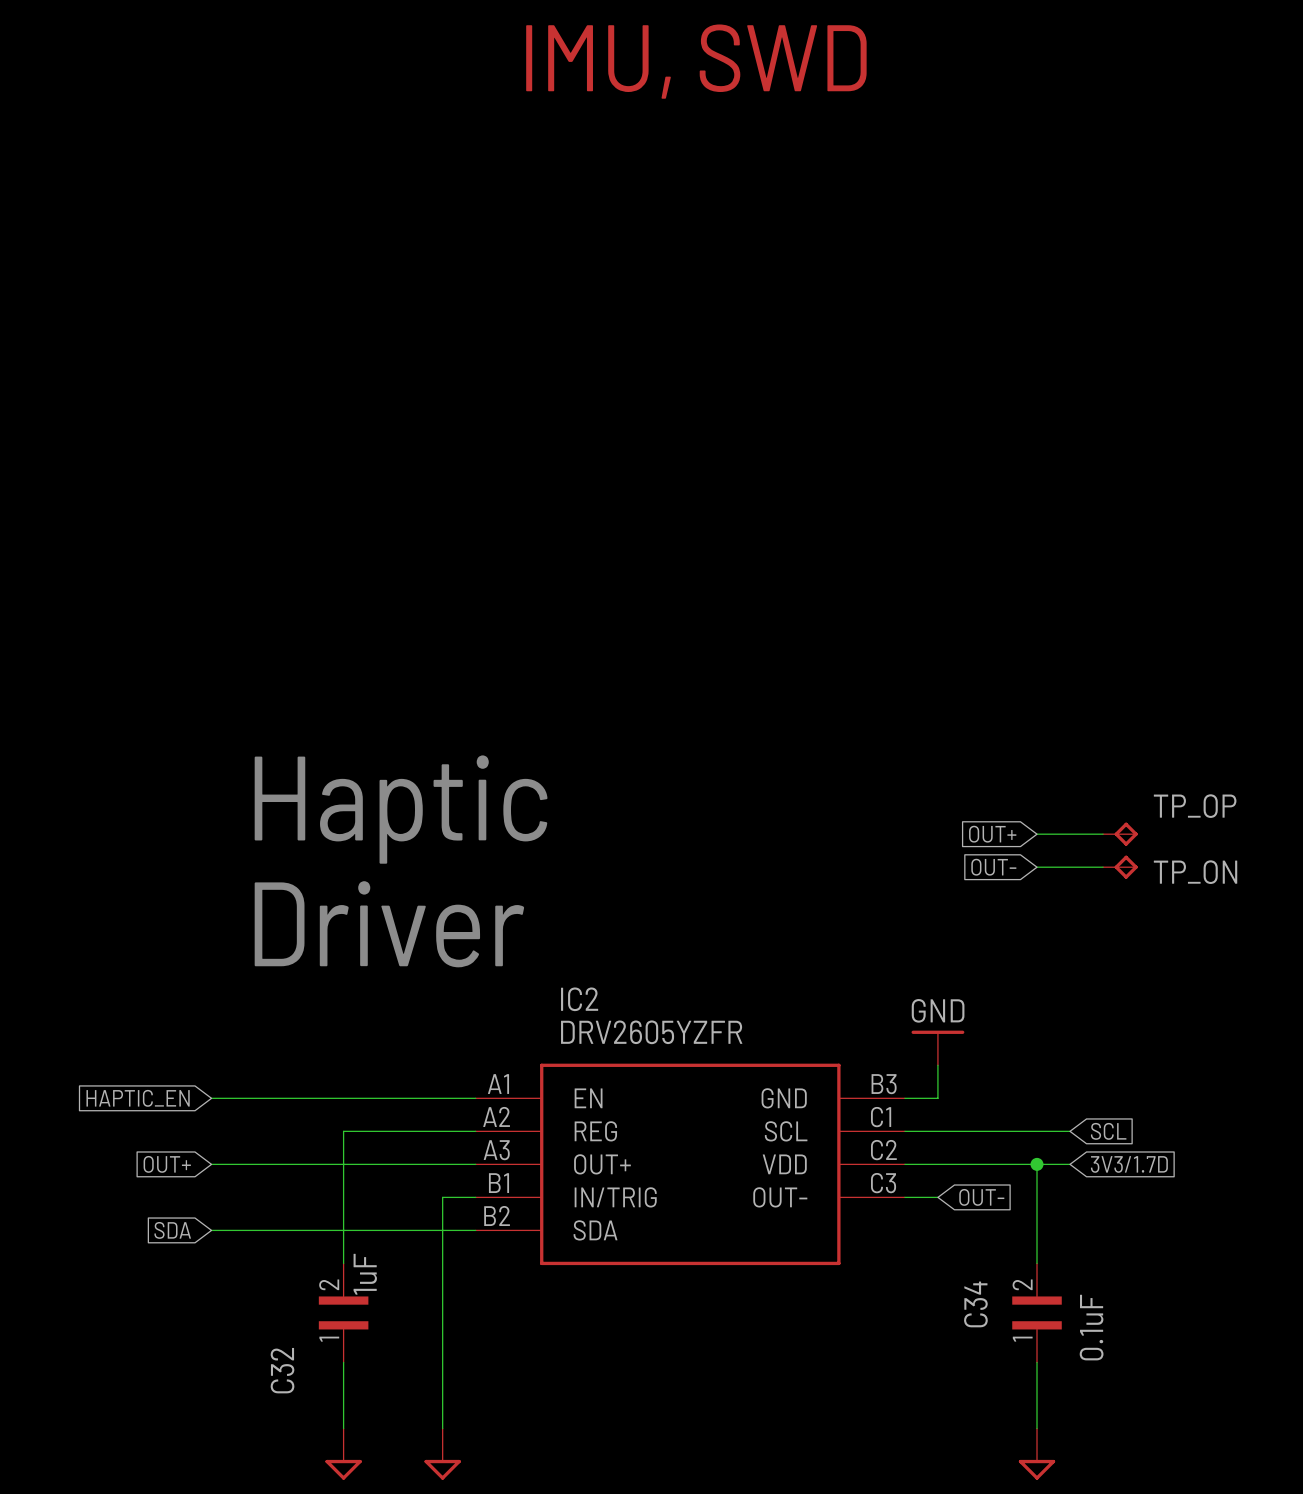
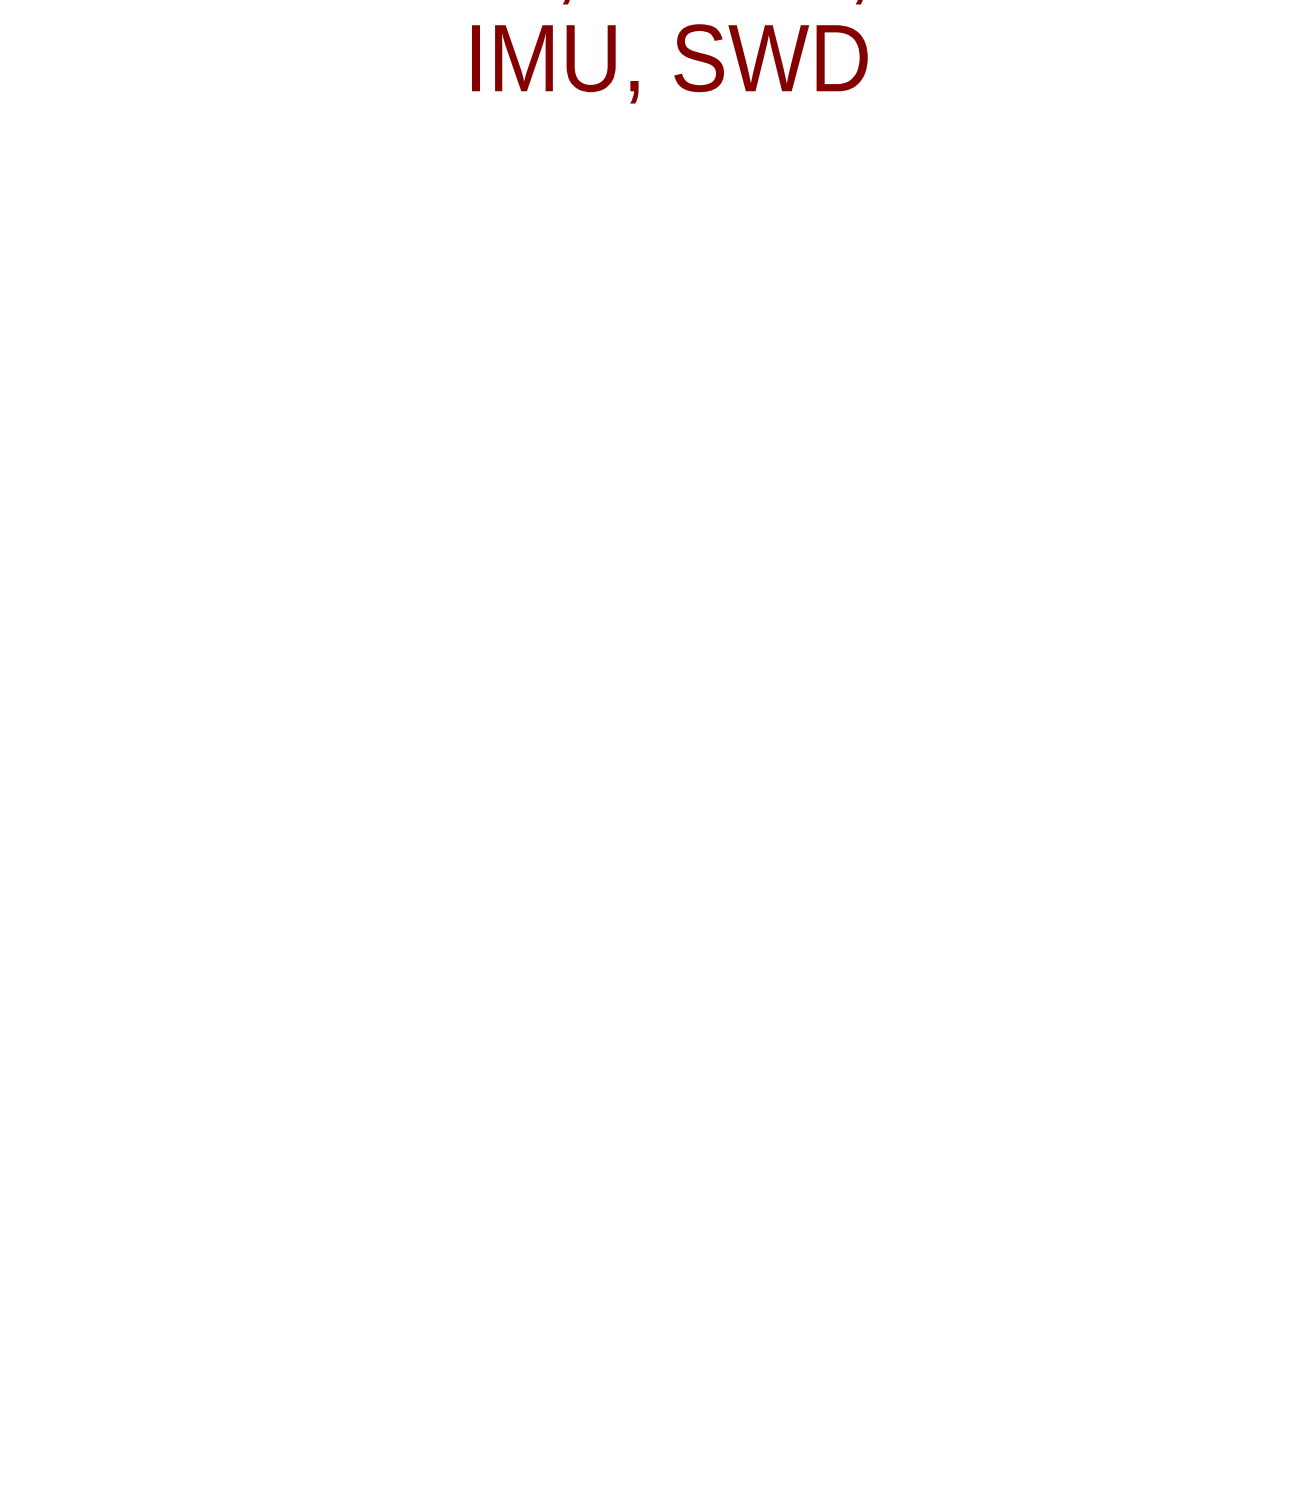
text: Haptic (401, 809) -> none
global label: OUT+ (992, 834) -> none
wire: (1037, 834) (1103, 834) -> none
TP_OP: (1120, 834) -> none
global label: OUT- (993, 867) -> none
wire: (1037, 867) (1103, 867) -> none
TP_ON: (1120, 867) -> none
text: Driver (389, 924) -> none
power symbol: GND (937, 1047) -> none
wire: (937, 1065) (937, 1098) (904, 1098) -> none
global label: HAPTIC_EN (138, 1098) -> none
wire: (211, 1098) (475, 1098) -> none
wire: (475, 1131) (343, 1131) (343, 1263) -> none
wire: (904, 1131) (1070, 1131) -> none
global label: SCL (1108, 1131) -> none
global label: OUT+ (167, 1164) -> none
wire: (211, 1164) (475, 1164) -> none
IC2: DRV2605YZFR (690, 1164) -> none
wire: (904, 1164) (1070, 1164) -> none
wire: (1037, 1164) (1037, 1263) -> none
junction: (1037, 1164) -> none
global label: 3V3/1.7D (1129, 1164) -> none
wire: (475, 1197) (442, 1197) (442, 1428) -> none
wire: (904, 1197) (937, 1197) -> none
global label: OUT- (981, 1197) -> none
global label: SDA (172, 1230) -> none
wire: (211, 1230) (475, 1230) -> none
C32: 1uF (343, 1312) -> none
C34: 0.1uF (1037, 1312) -> none
wire: (343, 1362) (343, 1428) -> none
wire: (1037, 1362) (1037, 1428) -> none
power symbol: (343, 1454) -> none
power symbol: (442, 1454) -> none
power symbol: (1037, 1454) -> none

